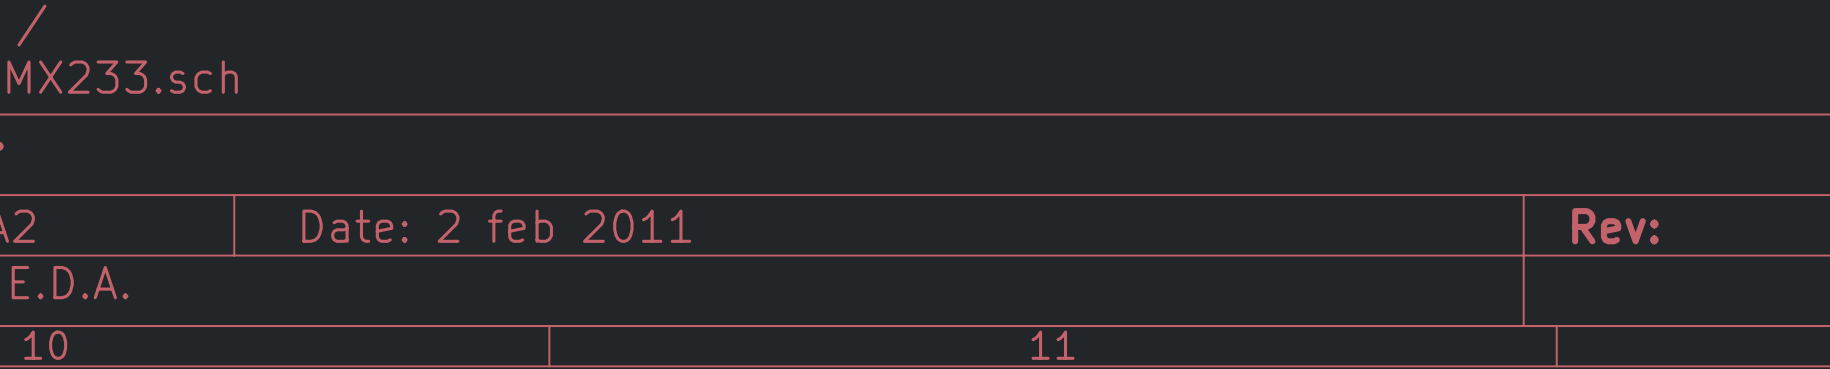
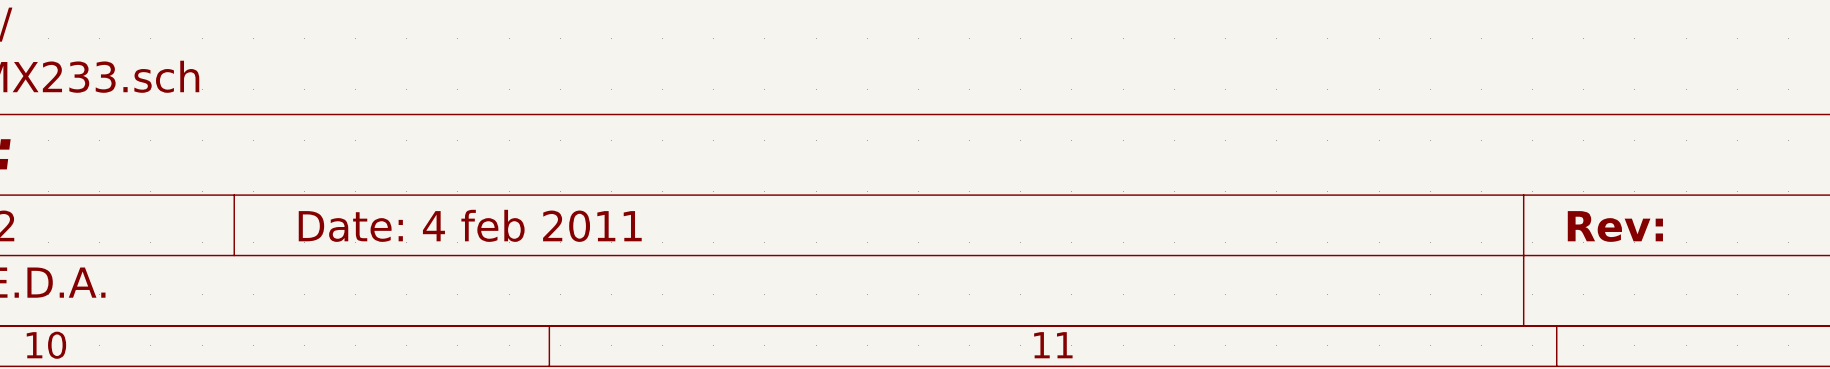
title block: Date: 2 feb 2011 (496, 226) -> Date: 4 feb 2011 (470, 225)

